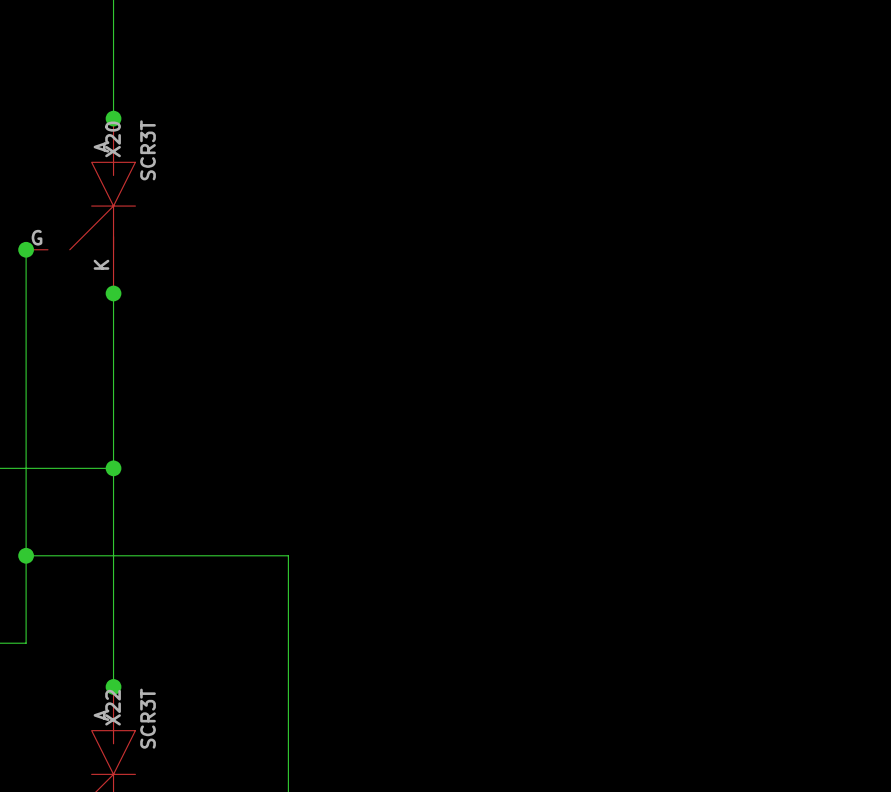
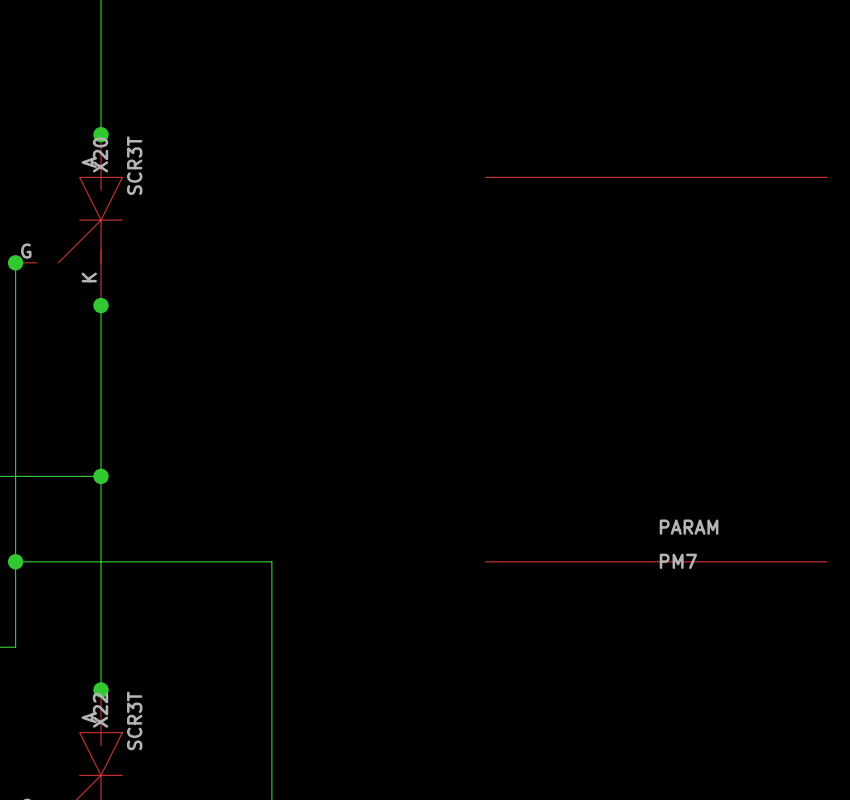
part: none -> (656, 177)
PM7: none -> PARAM (656, 561)

